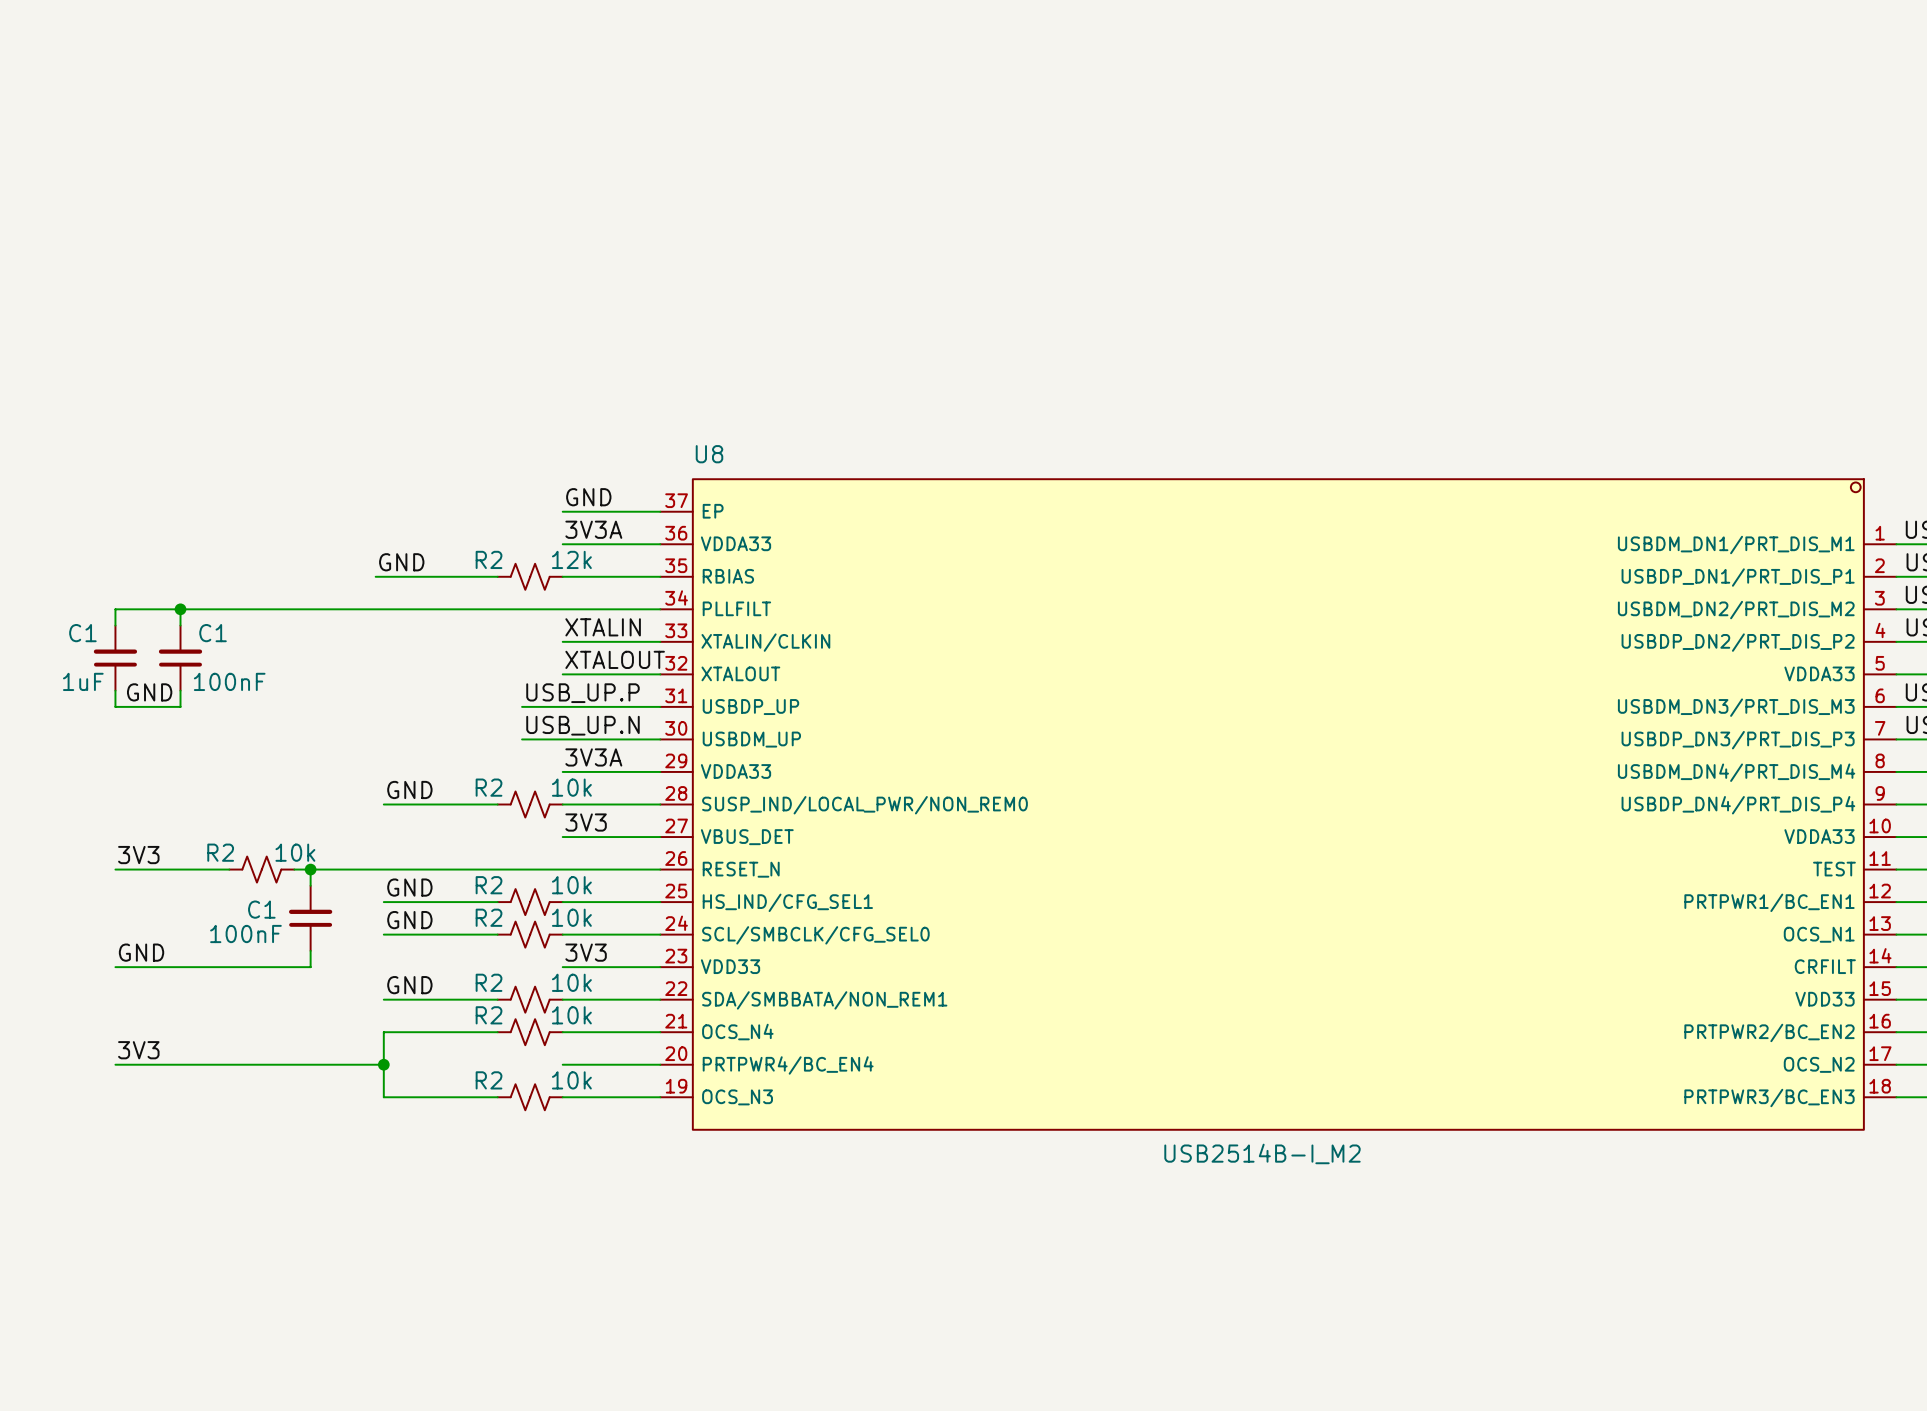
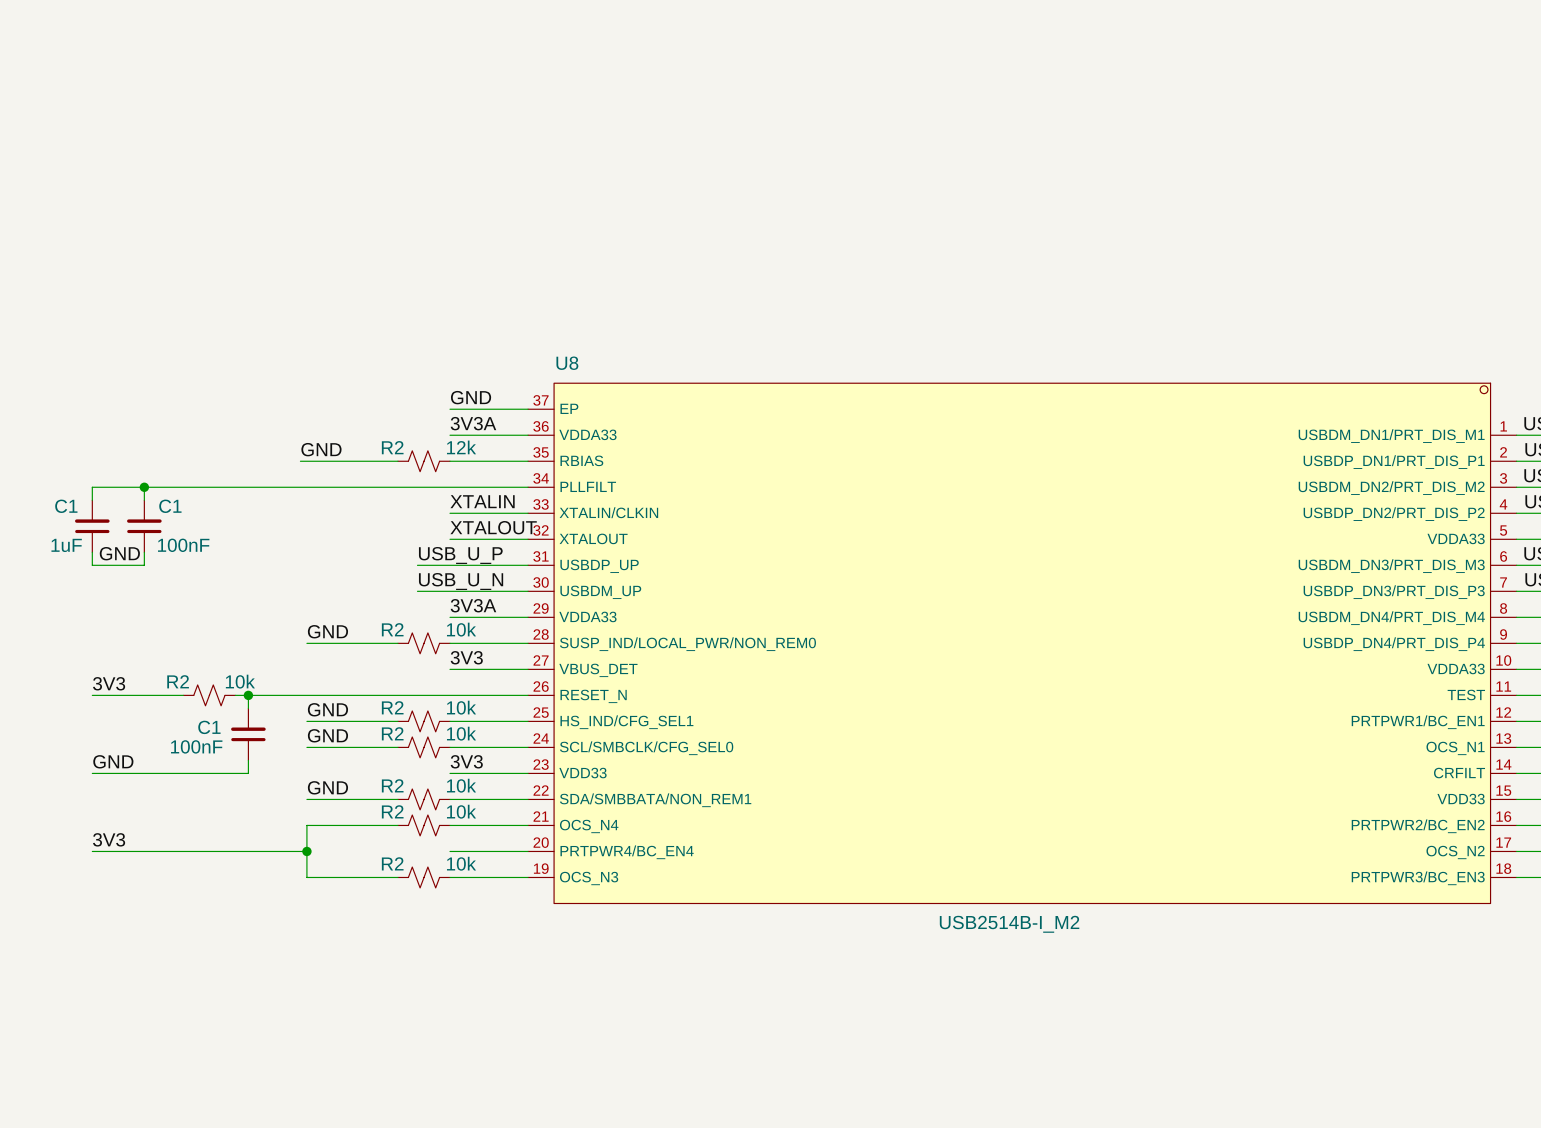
label: USB_UP.P (582, 693) -> USB_U_P (460, 555)
label: USB_UP.N (582, 725) -> USB_U_N (461, 581)

